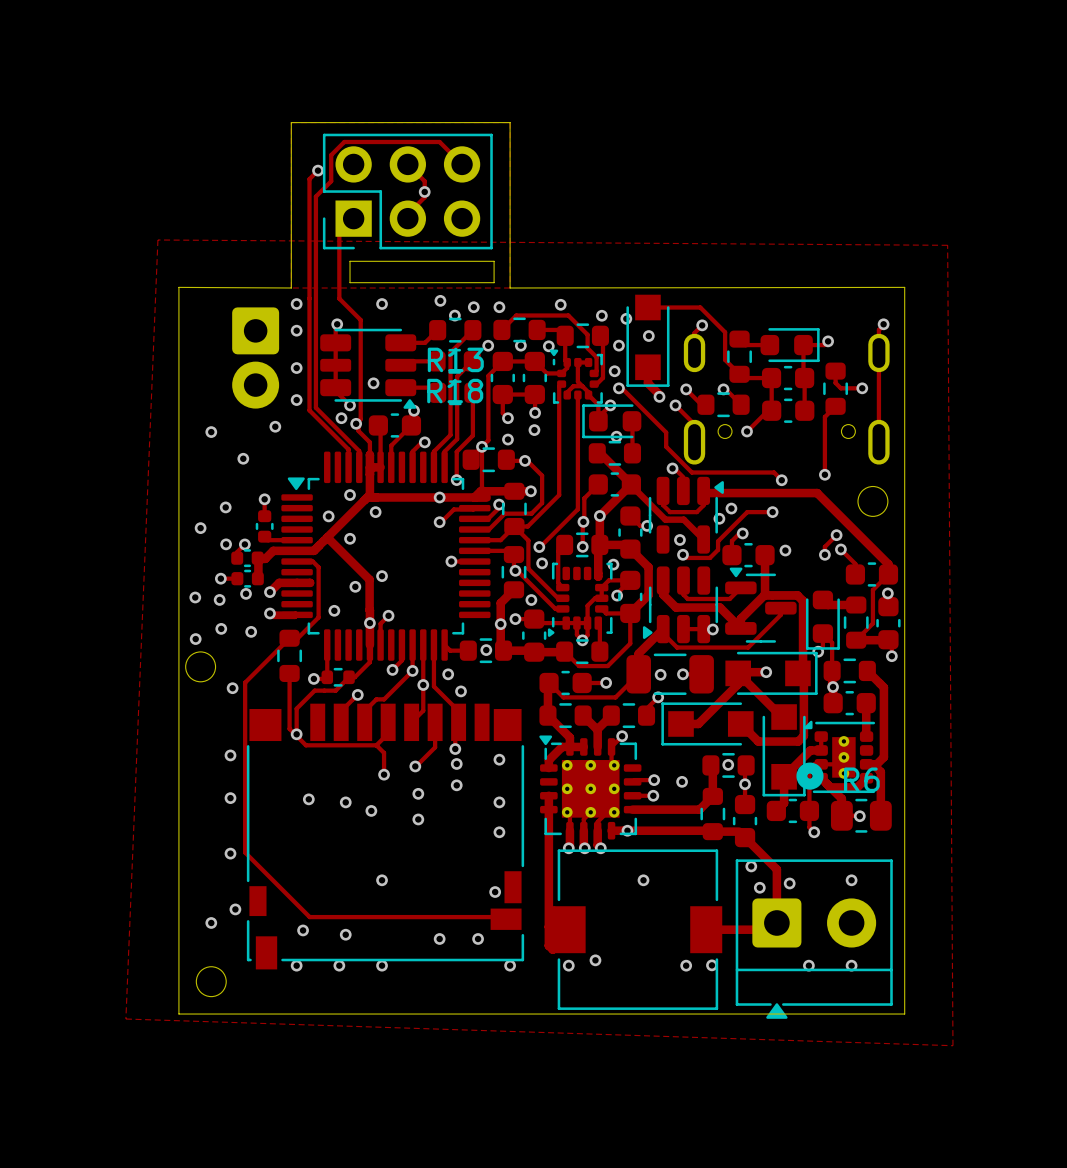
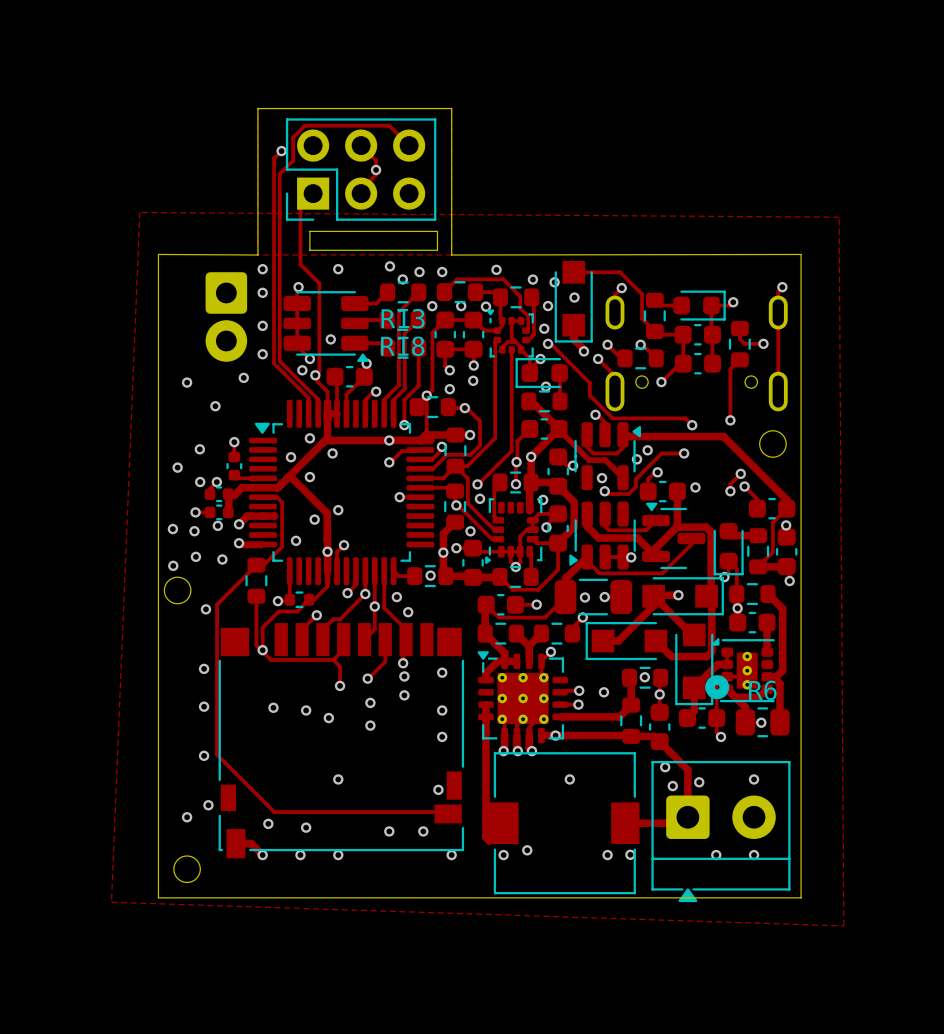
track: none -> (235, 843) (251, 843) (262, 855)

